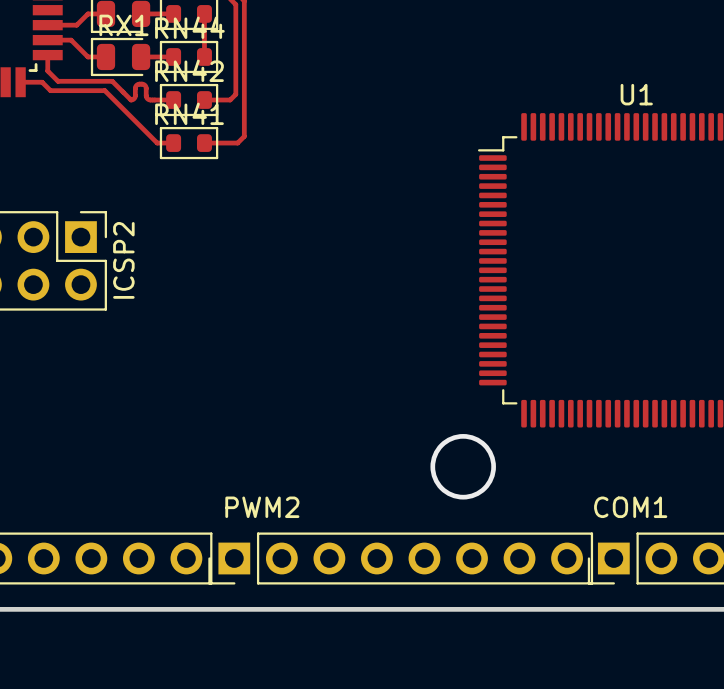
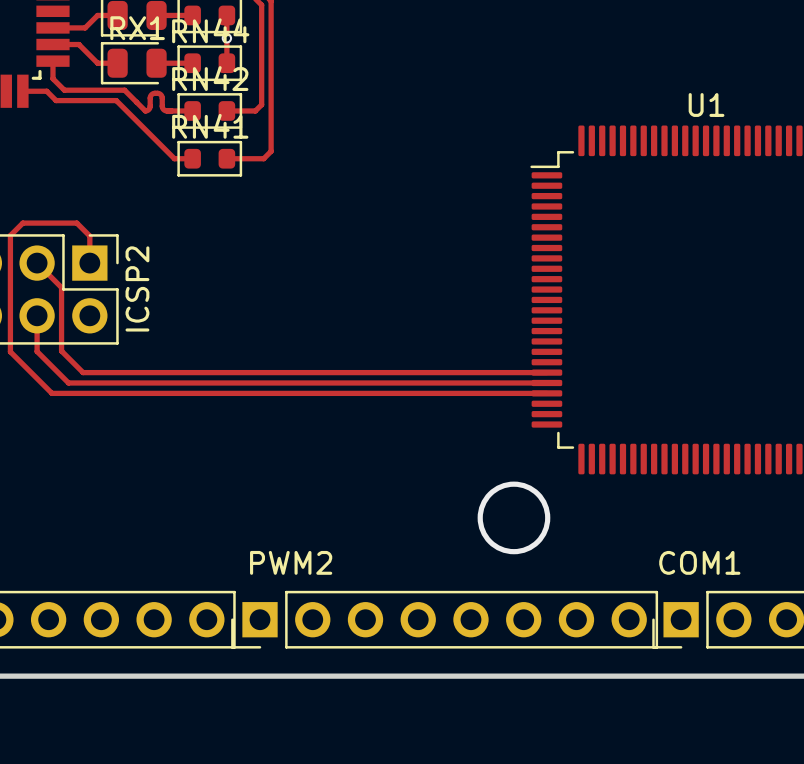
via: none -> (226, 38)
track: none -> (37, 263) (61, 287) (61, 351) (83, 372) (546, 372)
track: none -> (89, 263) (89, 236) (76, 223) (22, 223) (10, 235) (10, 351) (51, 393) (546, 393)
track: none -> (37, 315) (37, 351) (68, 382) (546, 382)

